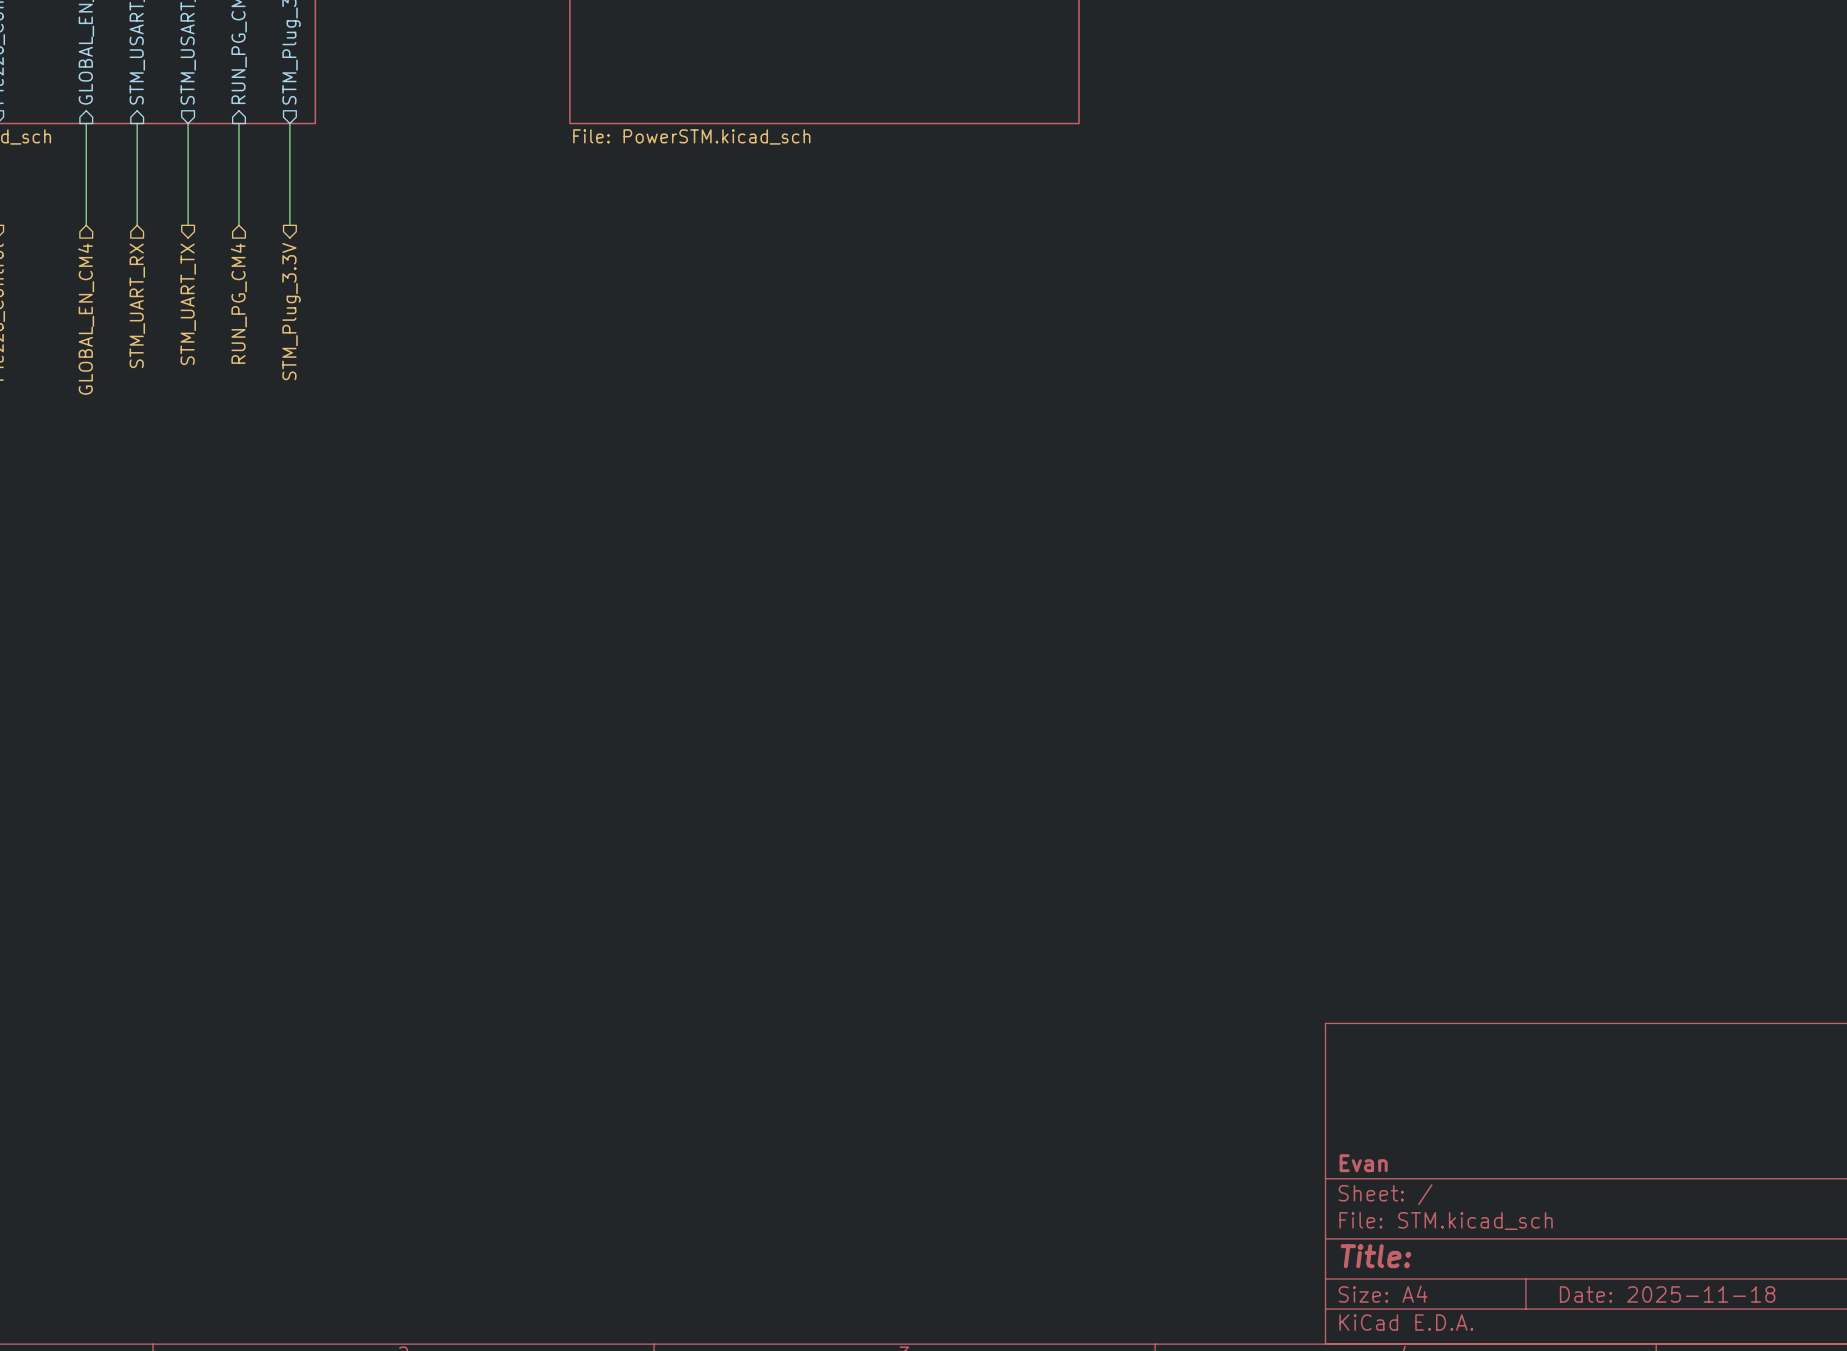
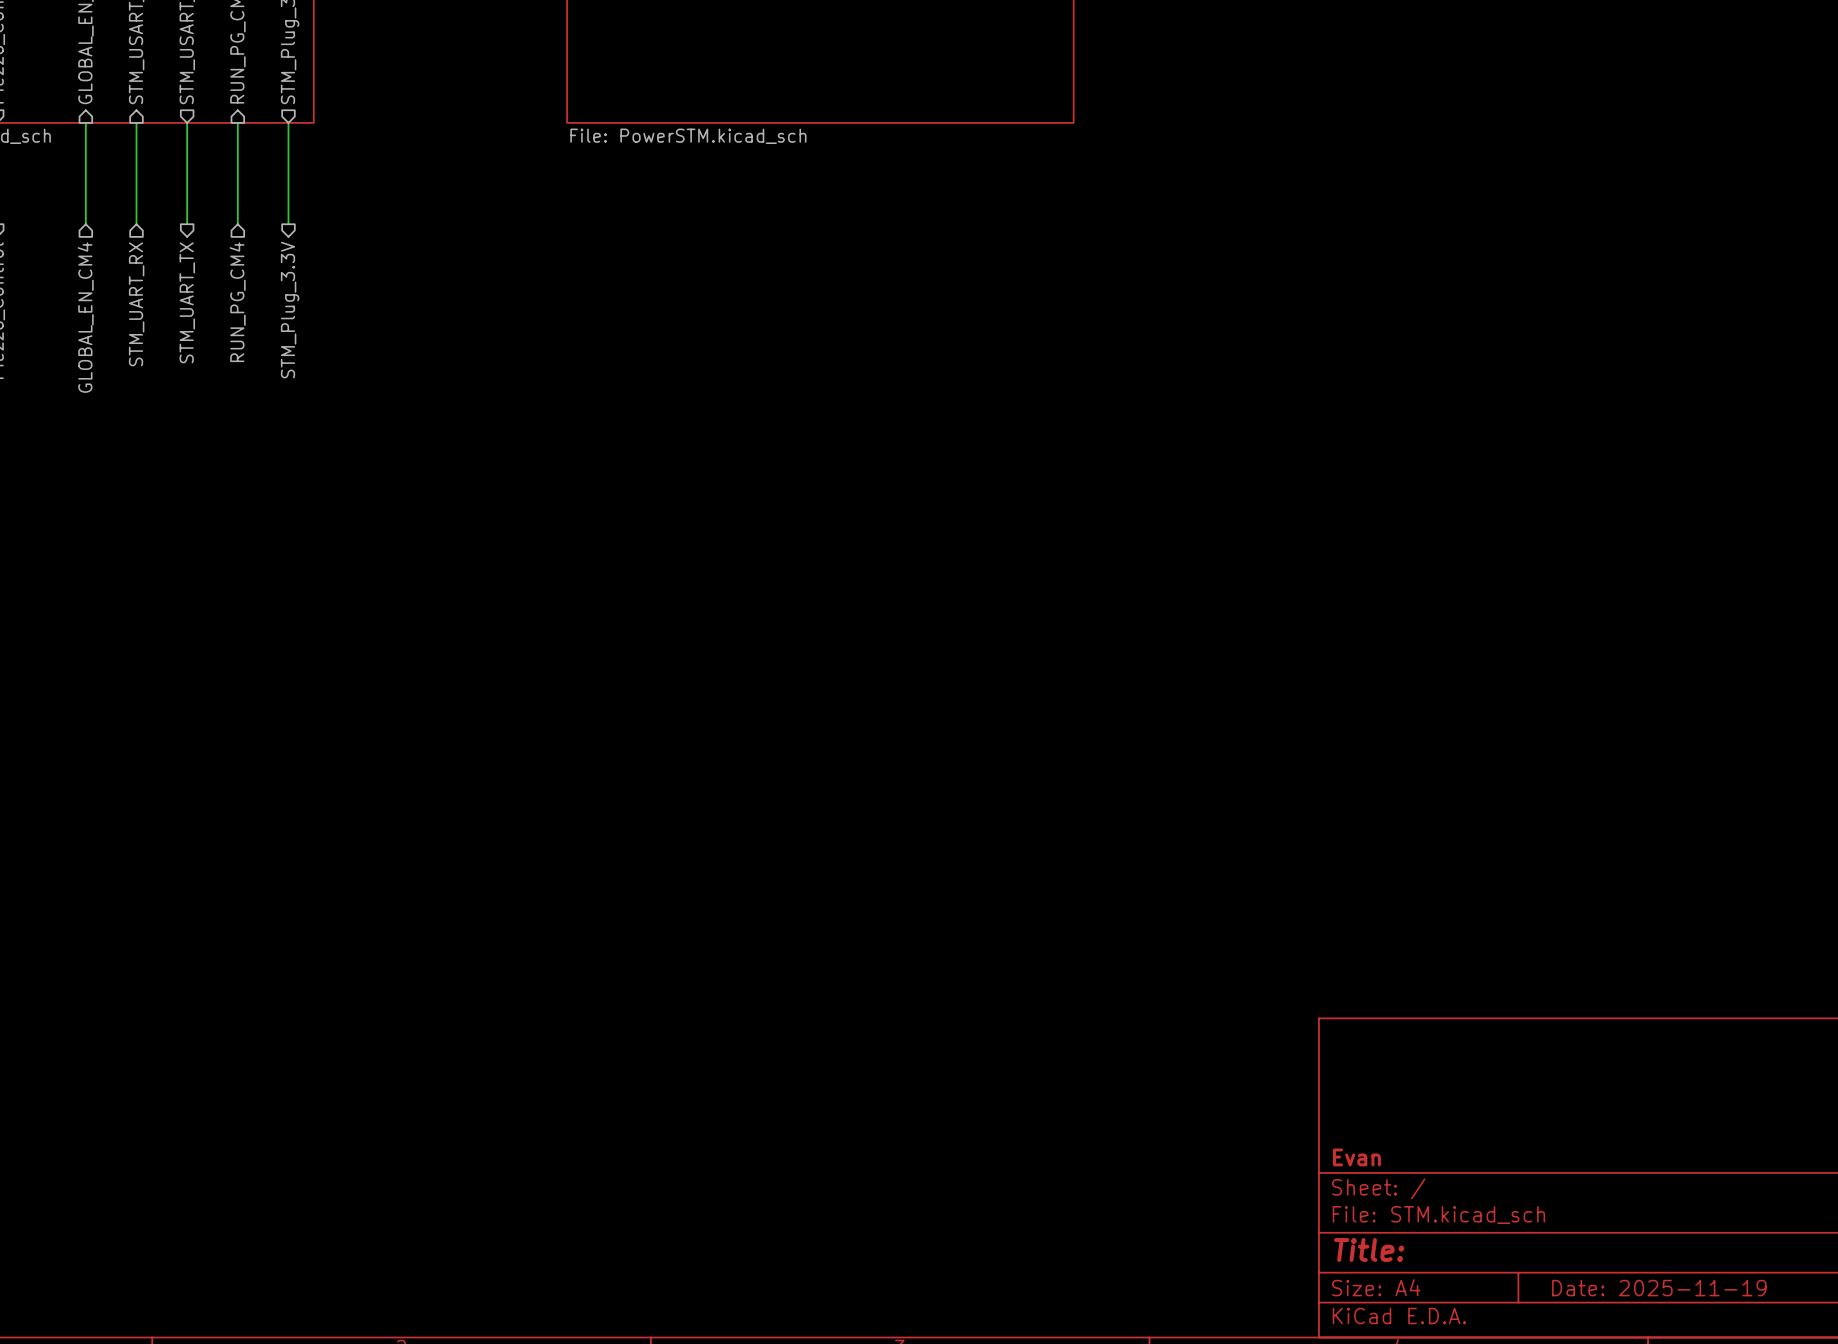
title block: Date: 2025-11-18 (1667, 1294) -> Date: 2025-11-19 (1659, 1288)

